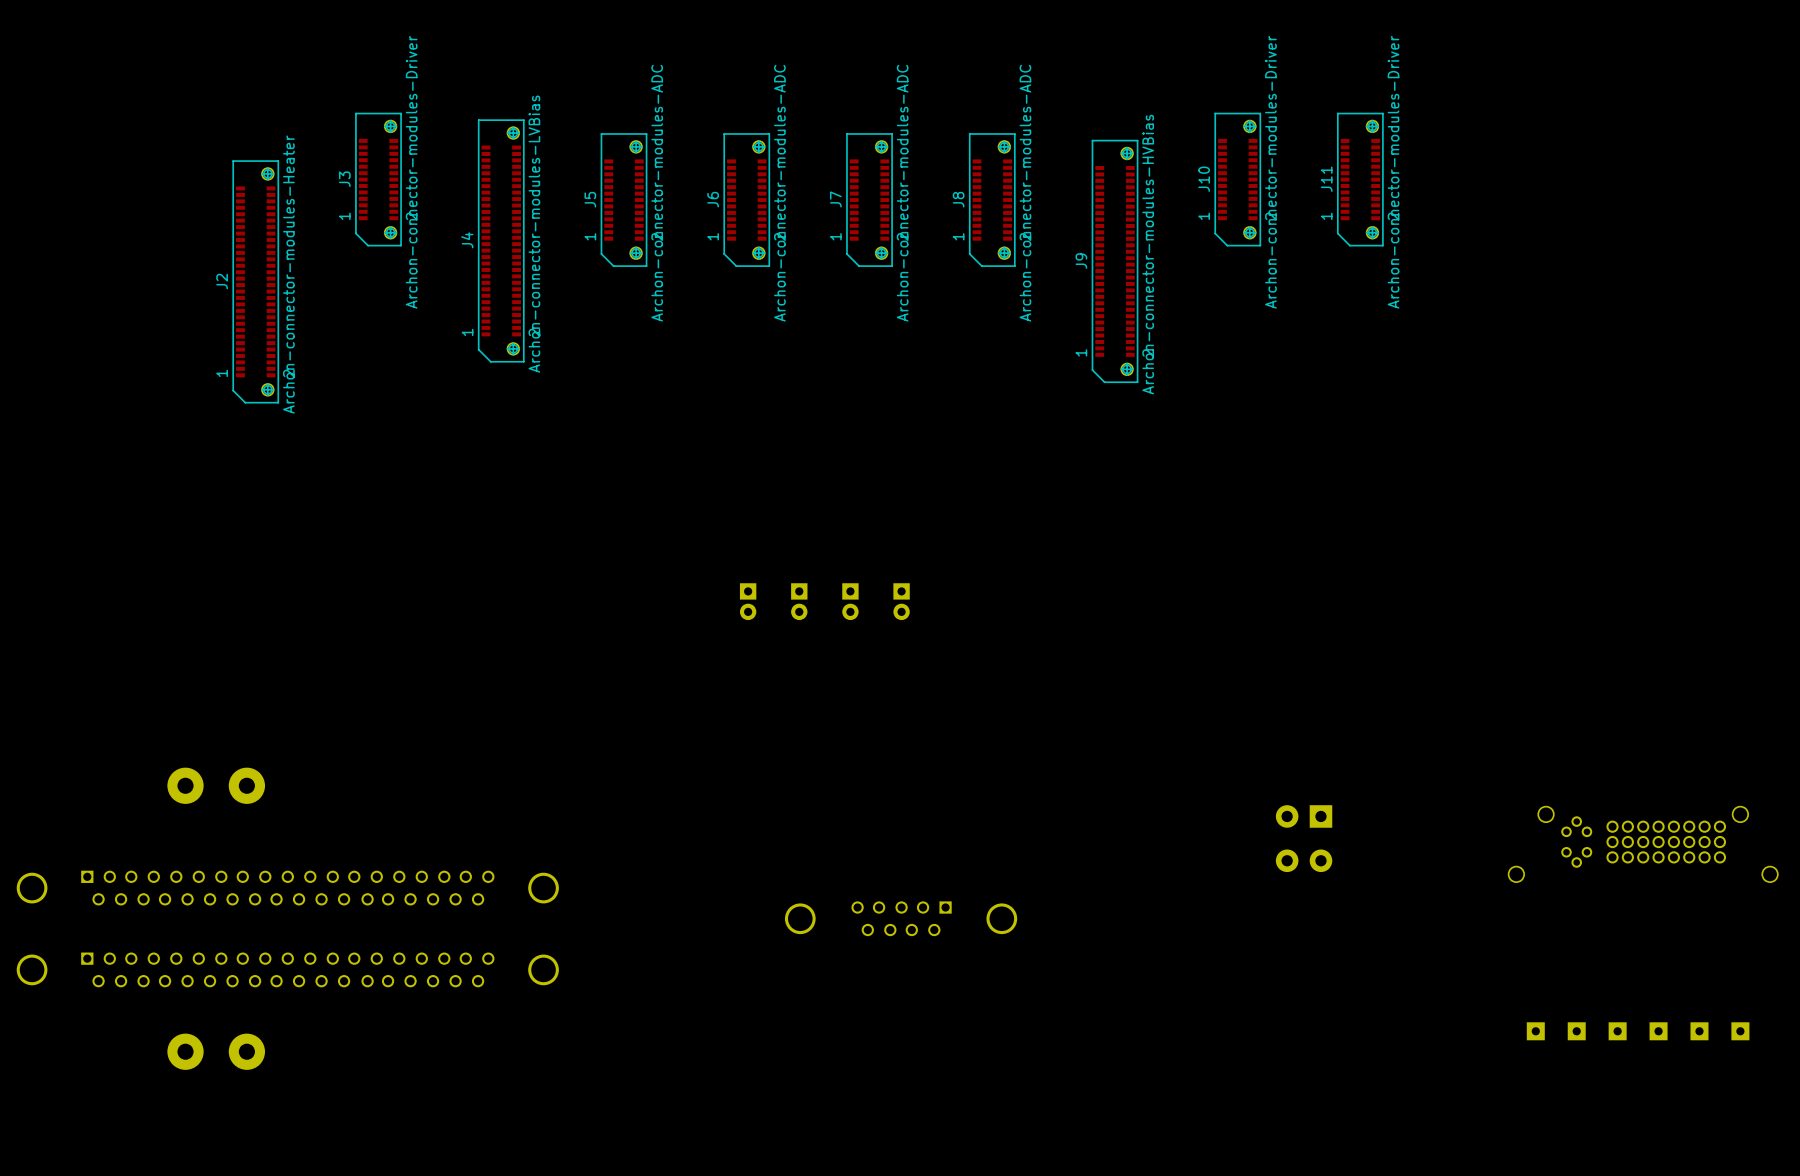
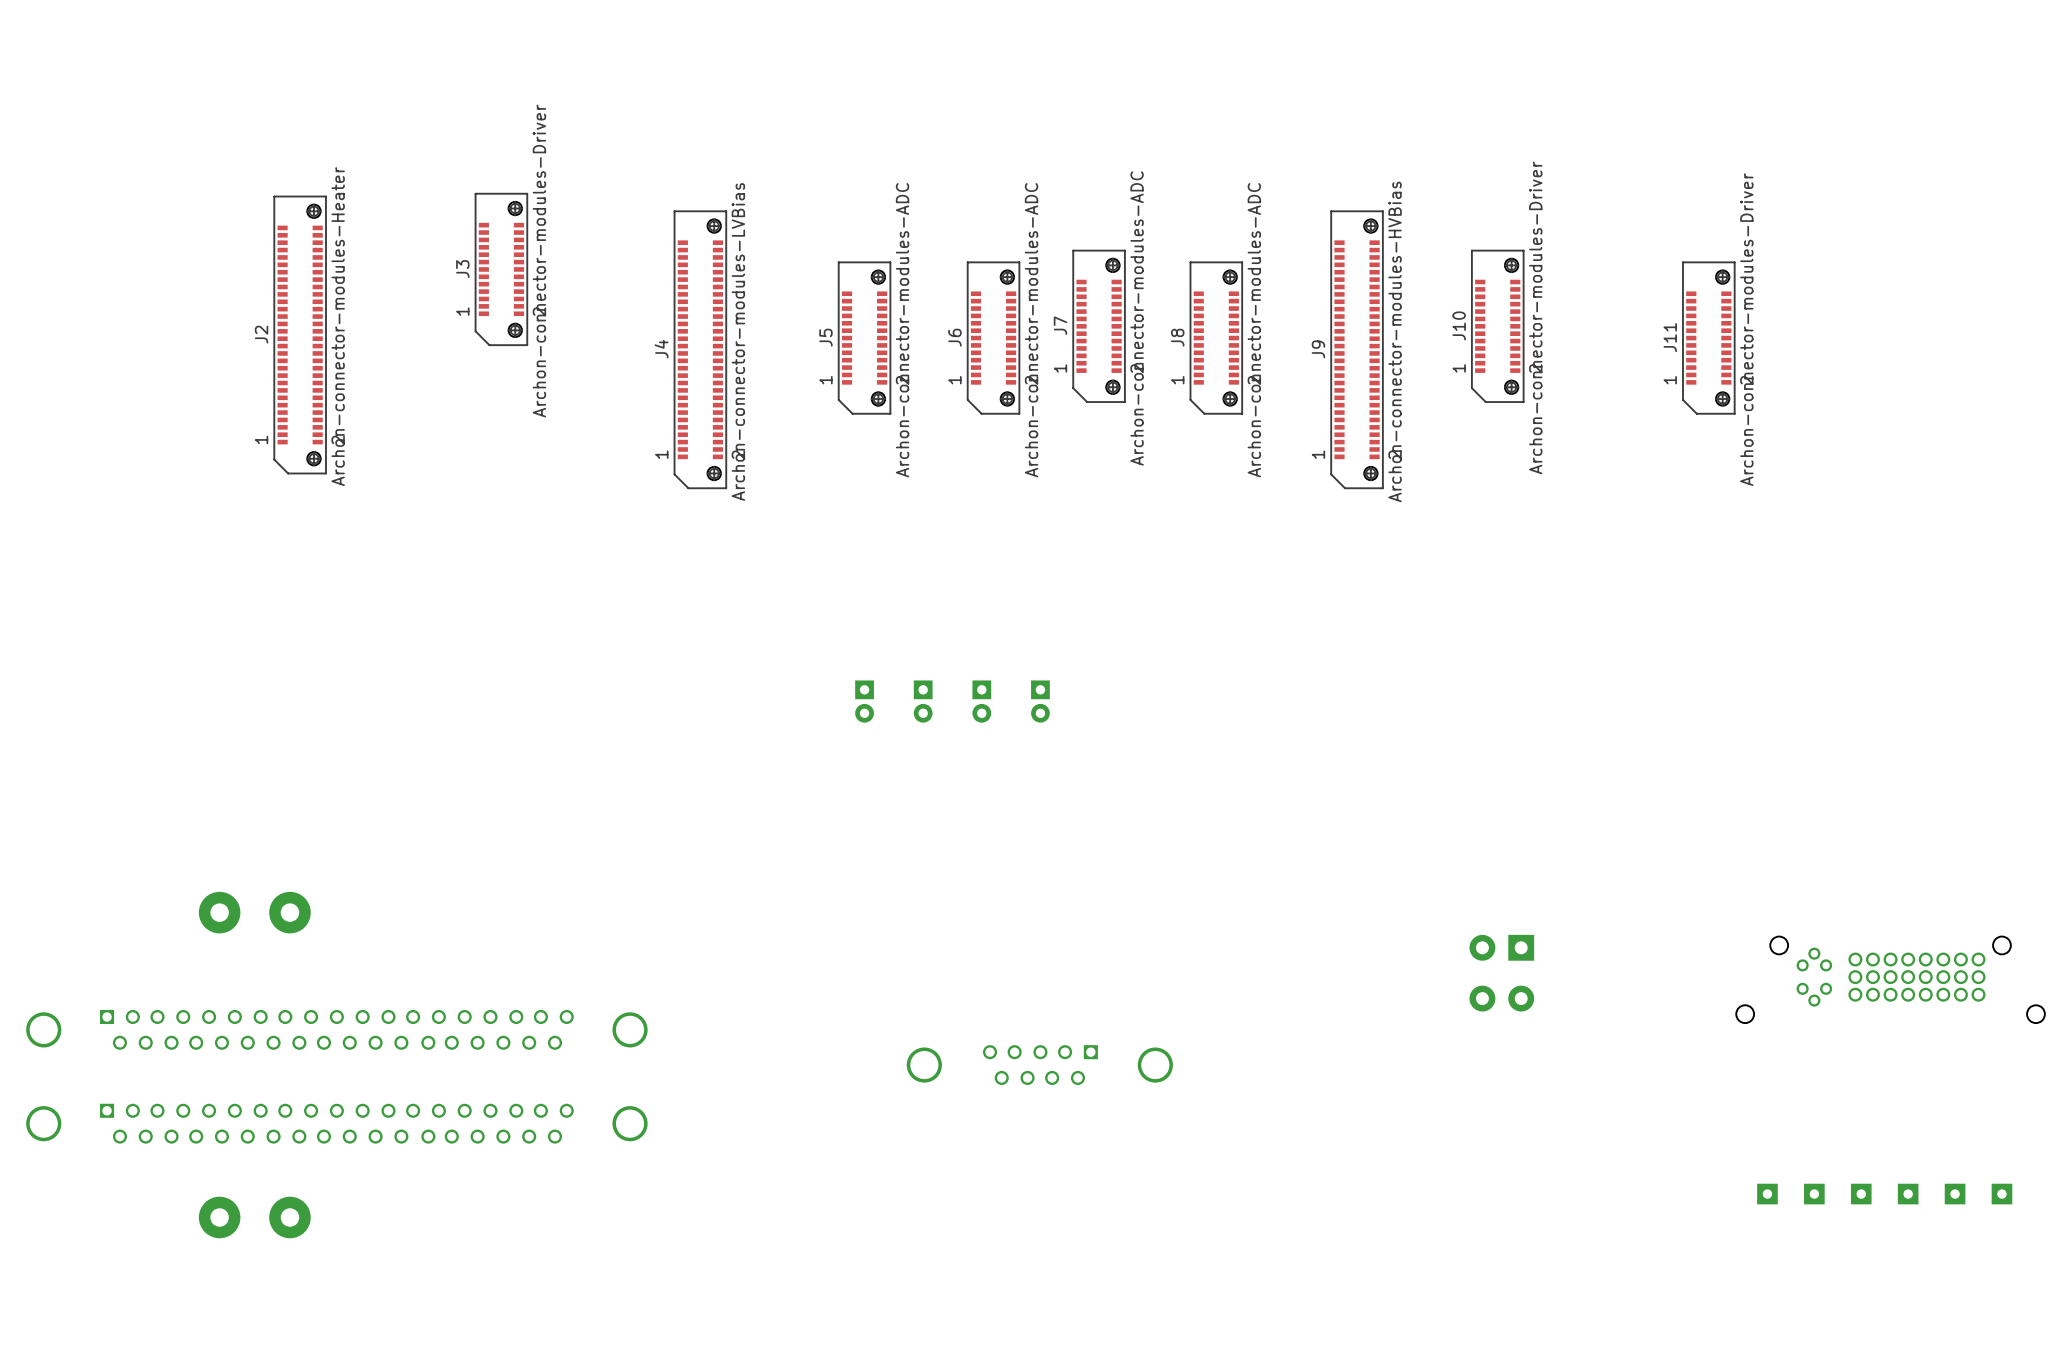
J3 position: (378, 179) -> (501, 269)
J10 position: (1237, 179) -> (1497, 326)
J11 position: (1360, 179) -> (1708, 338)
J5 position: (624, 200) -> (864, 338)
J6 position: (746, 200) -> (993, 338)
J7 position: (869, 200) -> (1099, 326)
J8 position: (992, 200) -> (1216, 338)
J4 position: (501, 240) -> (700, 349)
J9 position: (1115, 261) -> (1357, 349)

